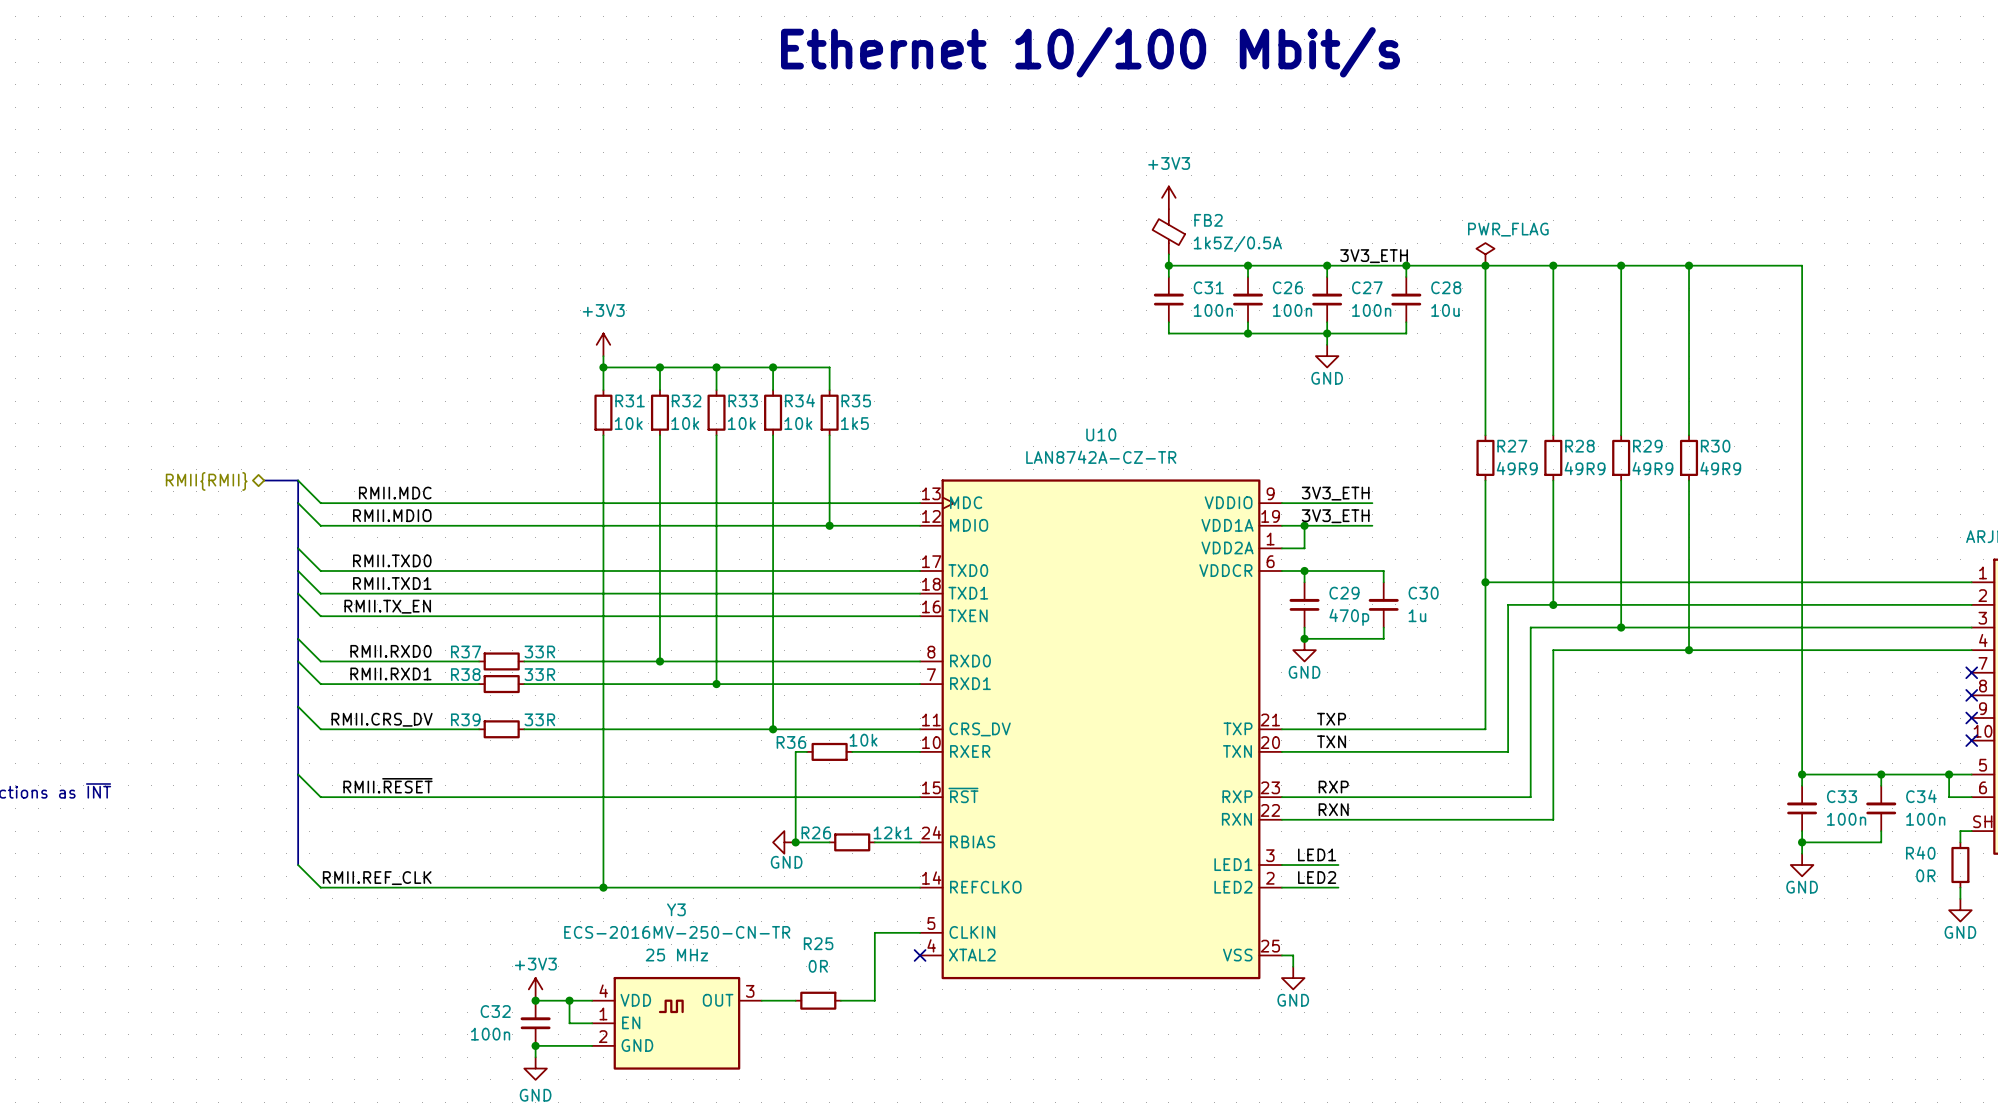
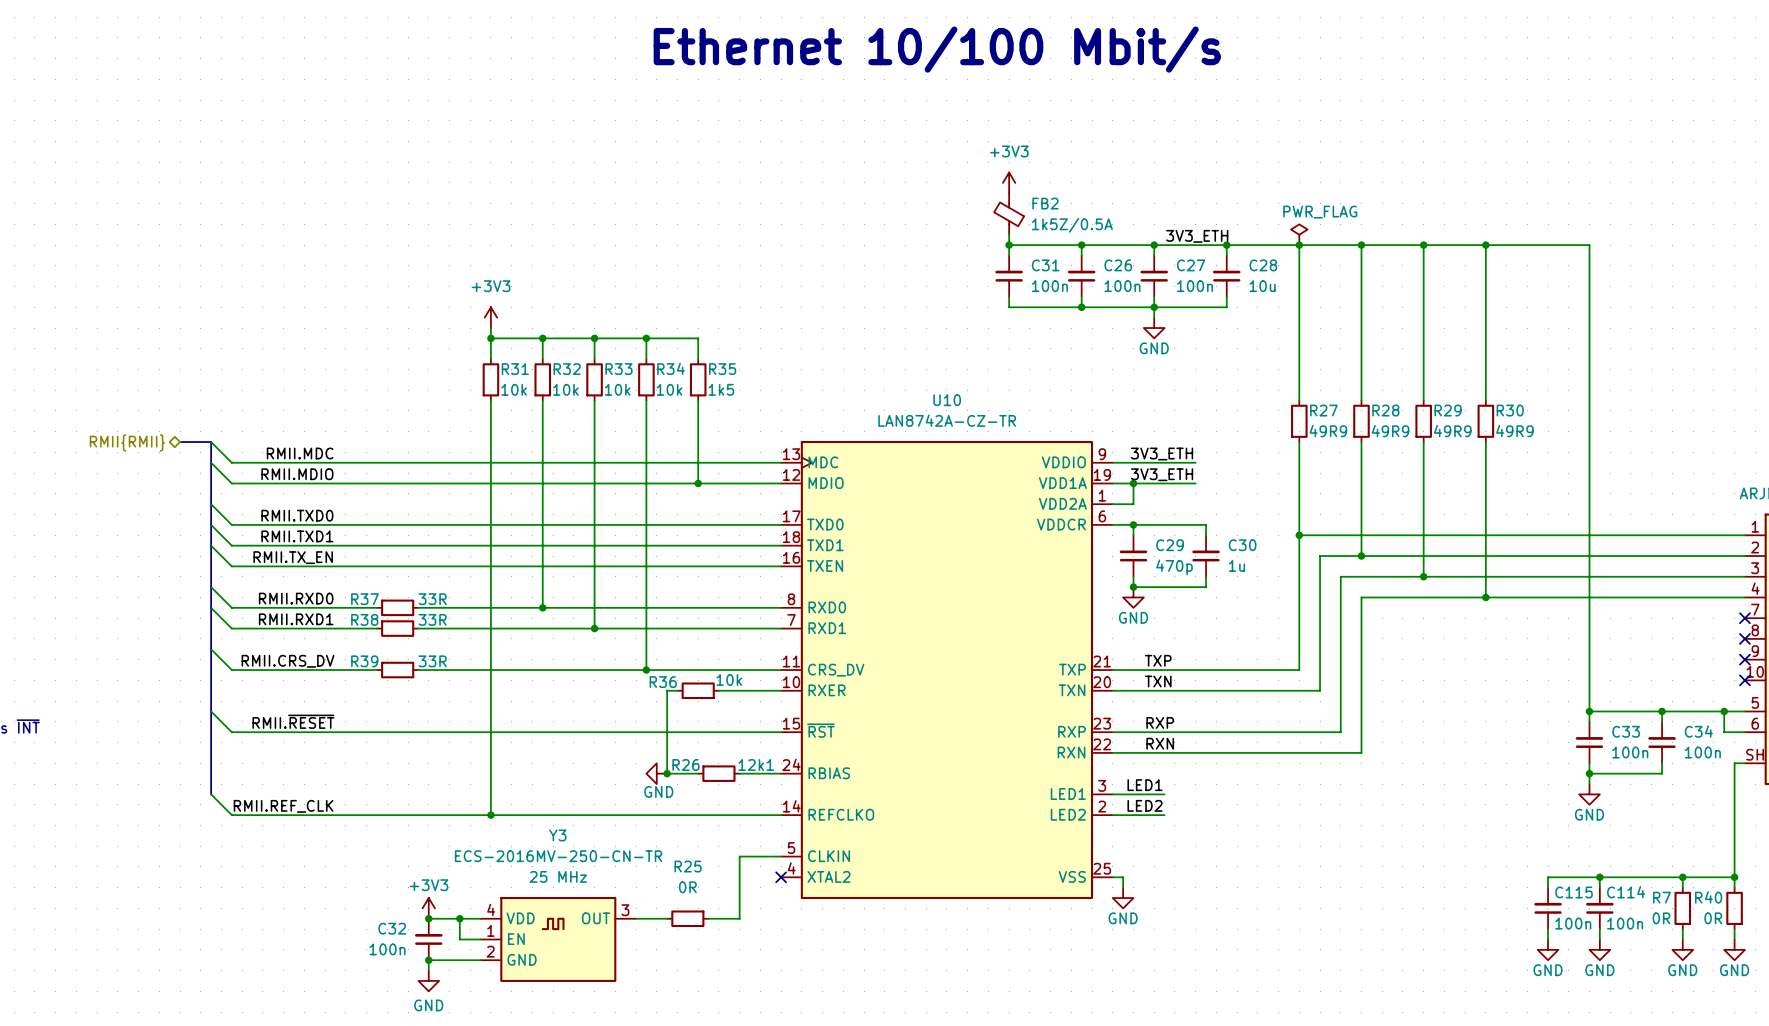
wire: none -> (1734, 773) (1734, 815)
R40 name position: R40 (1920, 853) -> R40 (1708, 897)
R40 position: (1960, 865) -> (1734, 908)
R40 text position: 0R (1925, 875) -> 0R (1713, 918)
wire: none -> (1734, 825) (1734, 887)
power symbol: GND (1960, 910) -> none
wire: none -> (1599, 877) (1599, 887)
junction: none -> (1599, 877)
wire: none -> (1682, 877) (1682, 887)
junction: none -> (1682, 877)
wire: none -> (1734, 877) (1548, 877) (1548, 887)
junction: none -> (1734, 877)
C115: none -> (1548, 908)
C114: none -> (1599, 908)
R7: none -> (1682, 908)
wire: none -> (1548, 929) (1548, 939)
wire: none -> (1599, 929) (1599, 939)
wire: none -> (1682, 929) (1682, 939)
wire: none -> (1734, 929) (1734, 939)
power symbol: none -> GND (1548, 949)
power symbol: none -> GND (1599, 949)
power symbol: none -> GND (1682, 949)
power symbol: none -> GND (1734, 949)

